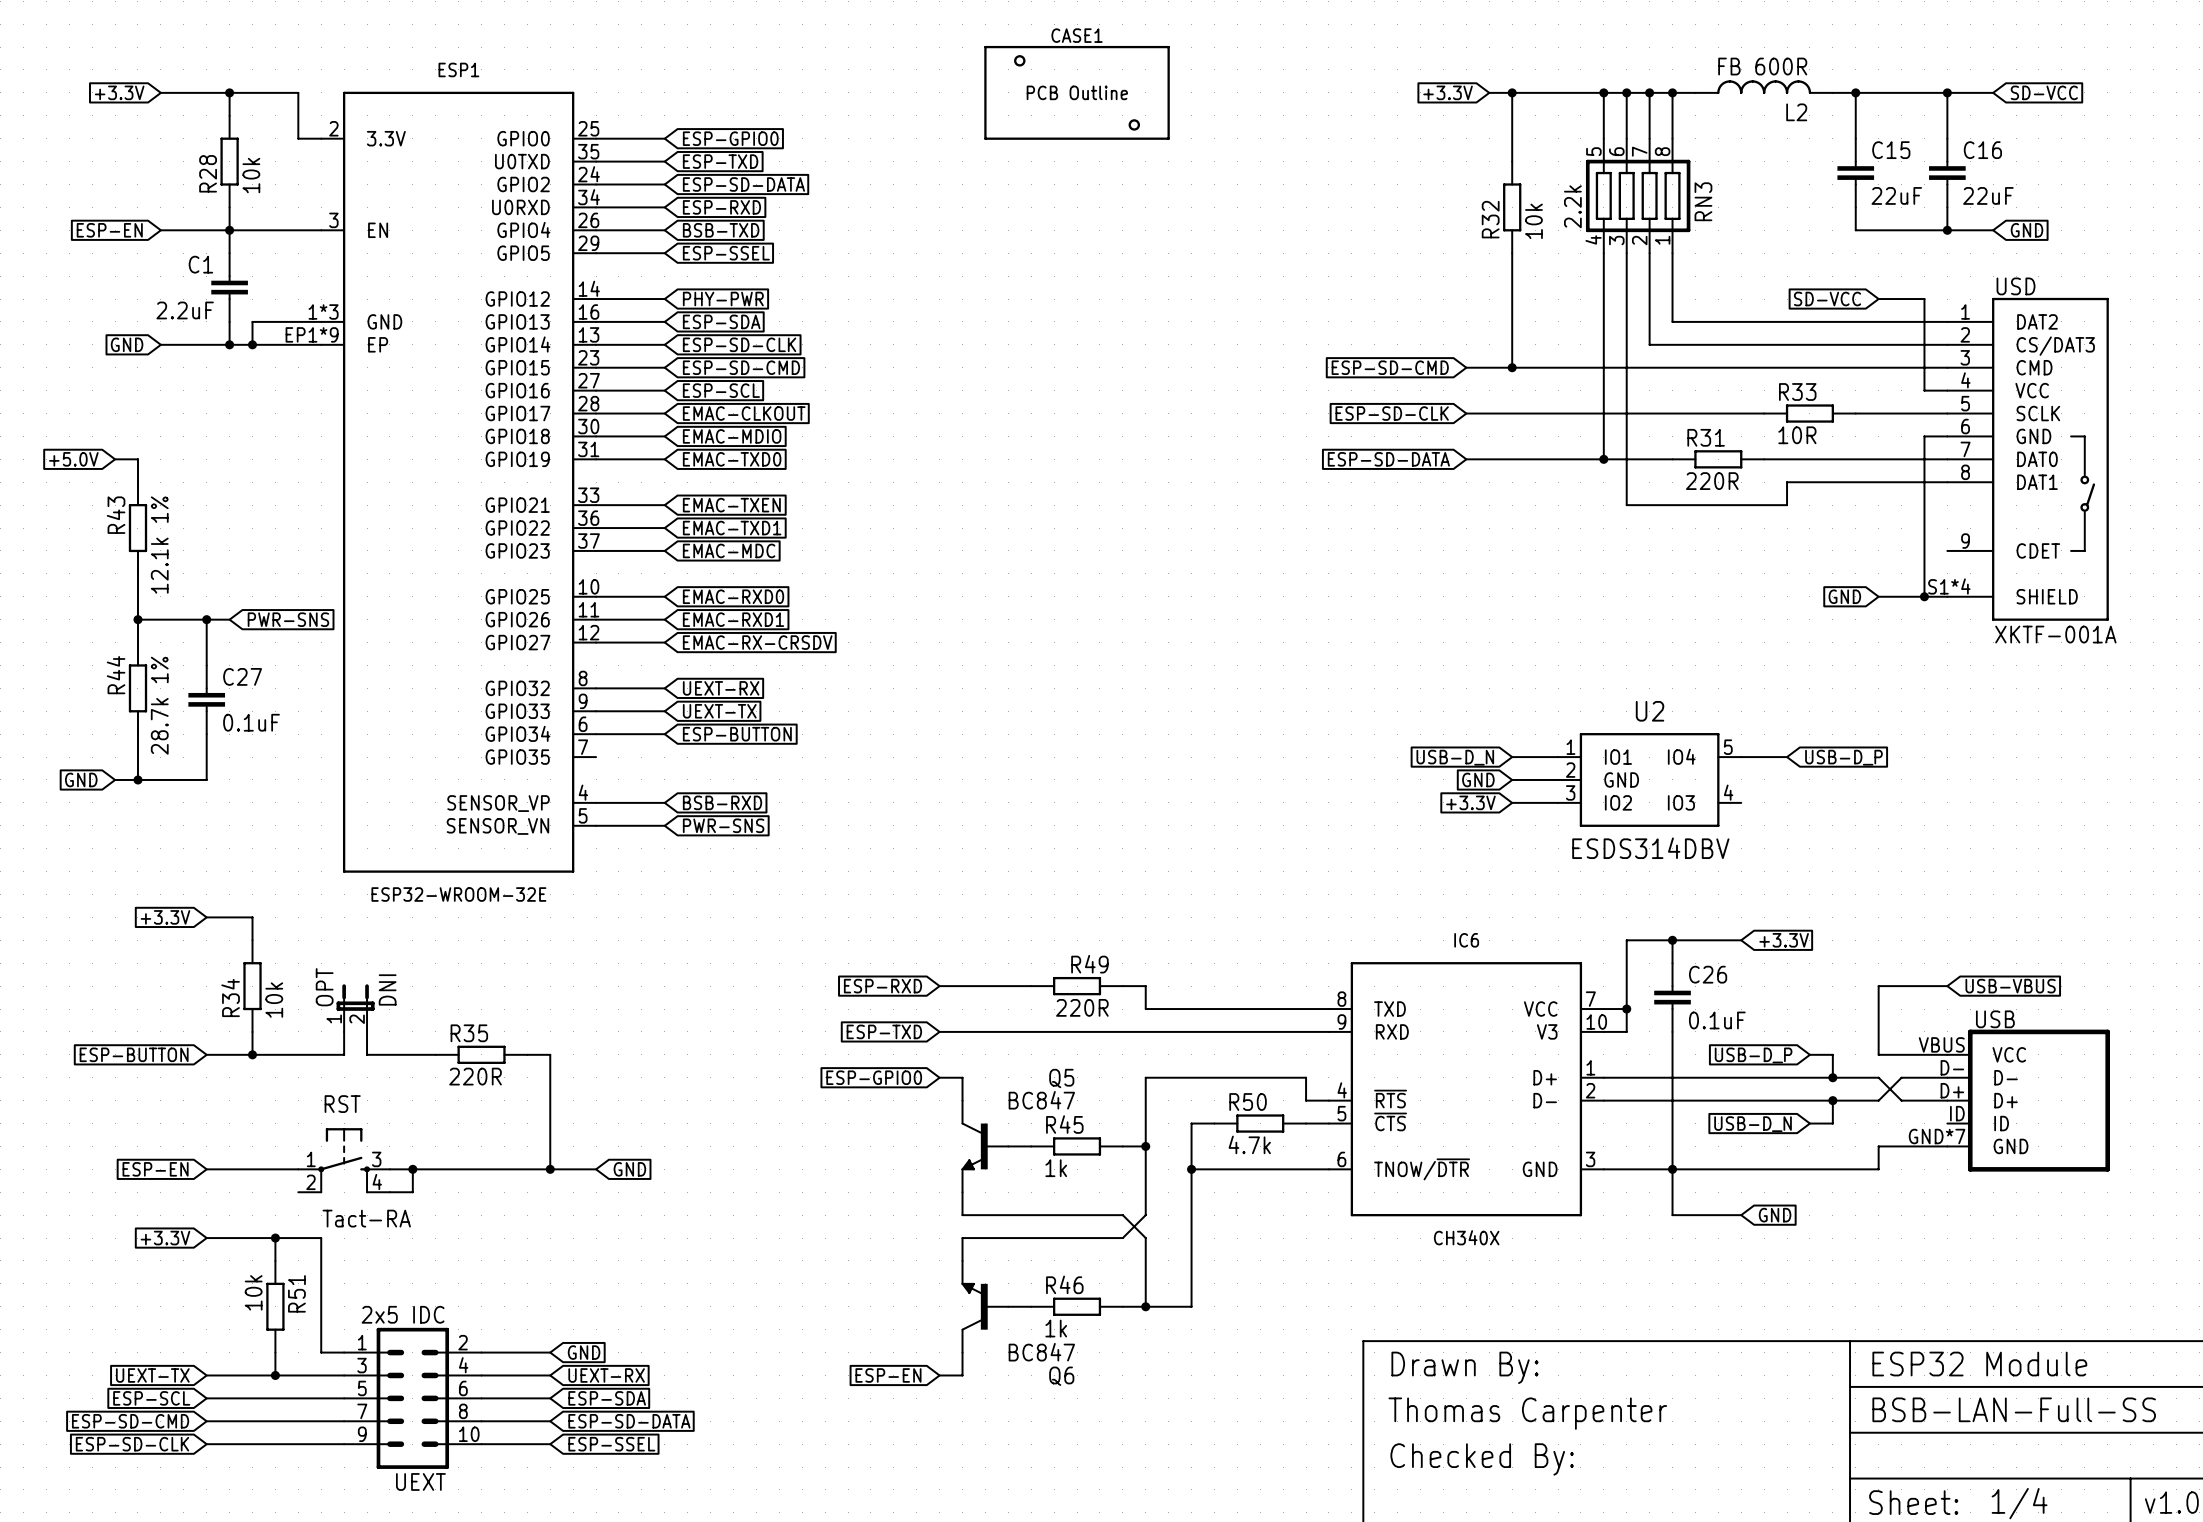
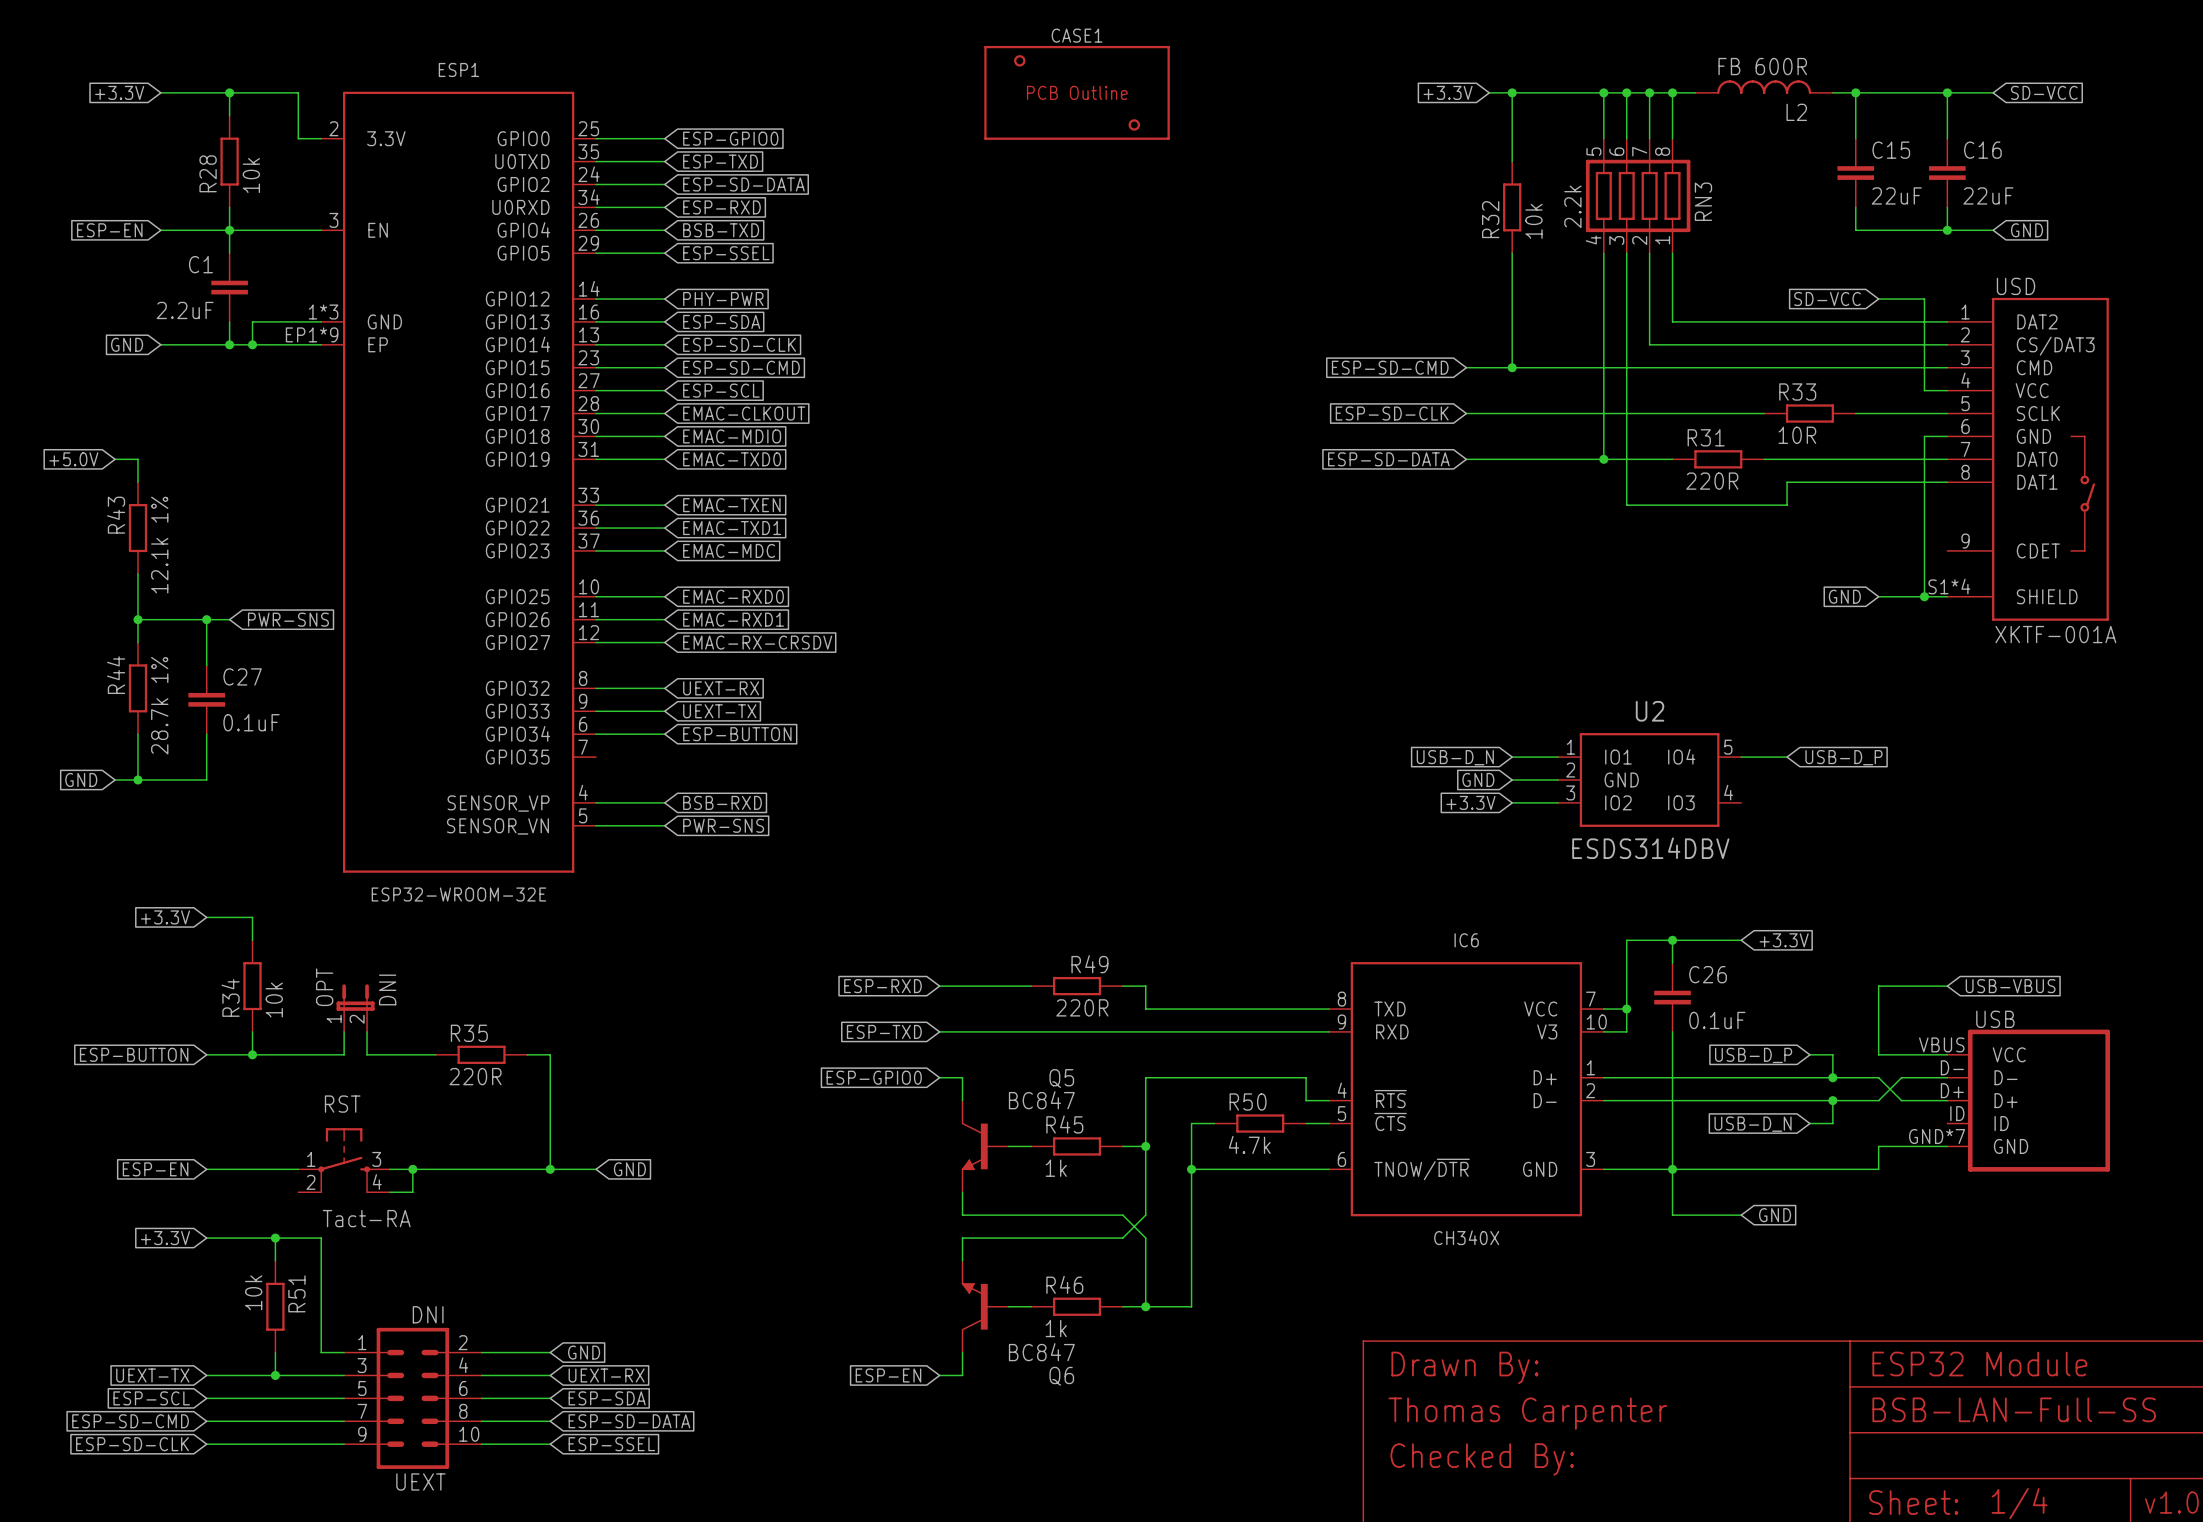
UEXT value: 2x5 IDC (403, 1314) -> DNI (428, 1314)

